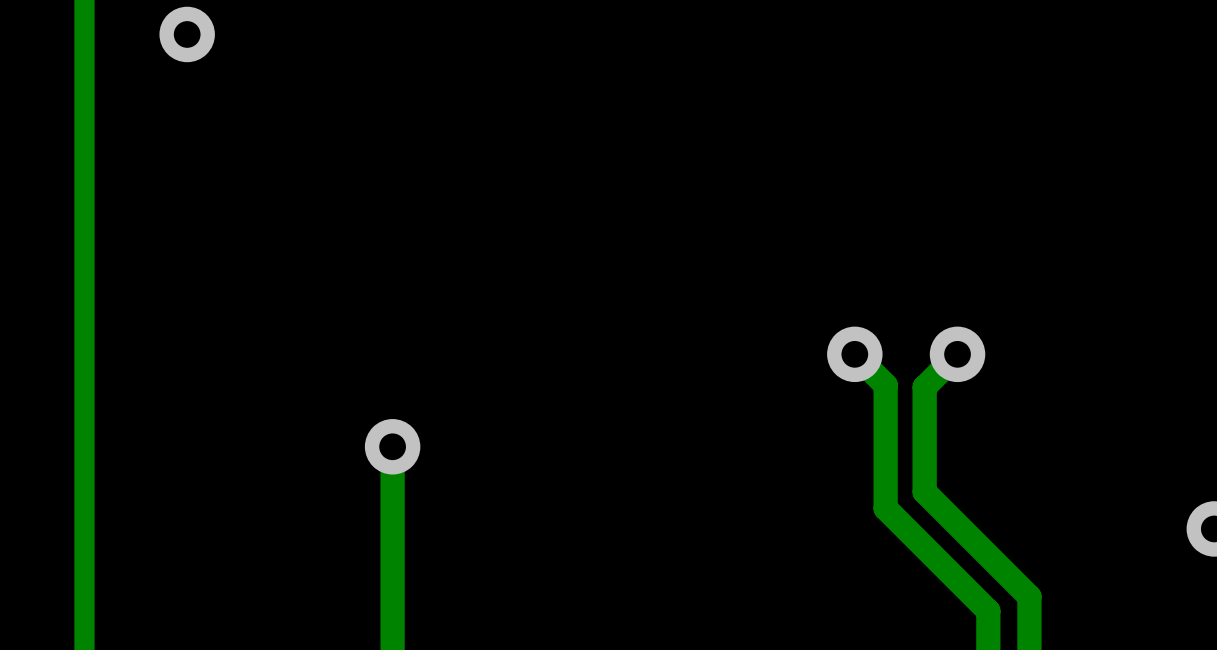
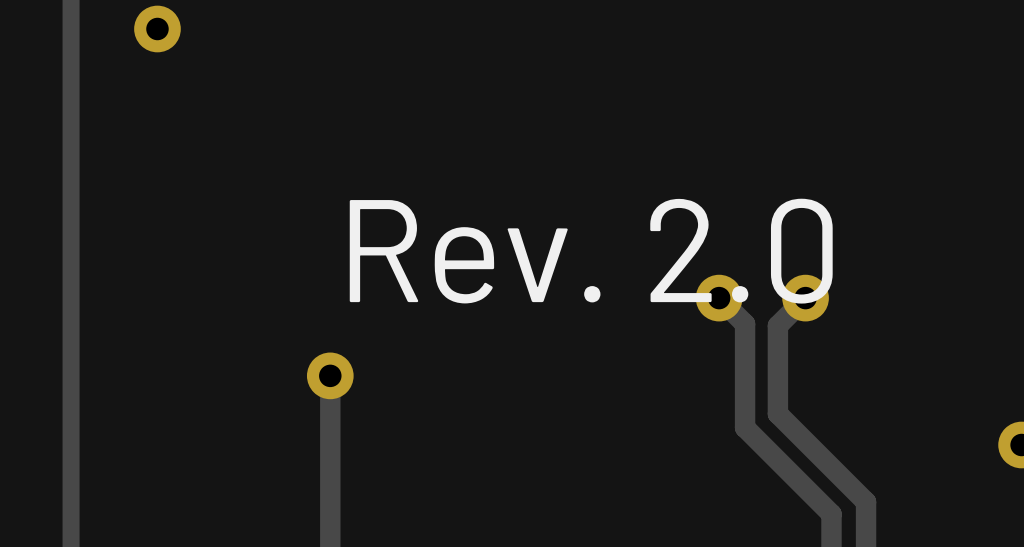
text: none -> Rev. 2.0 (591, 251)

